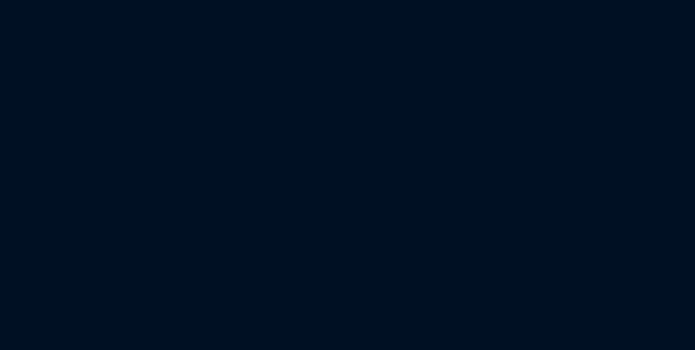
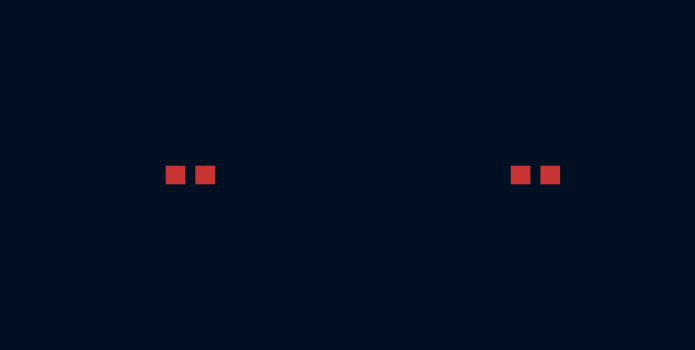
part: none -> (190, 174)
part: none -> (535, 174)

